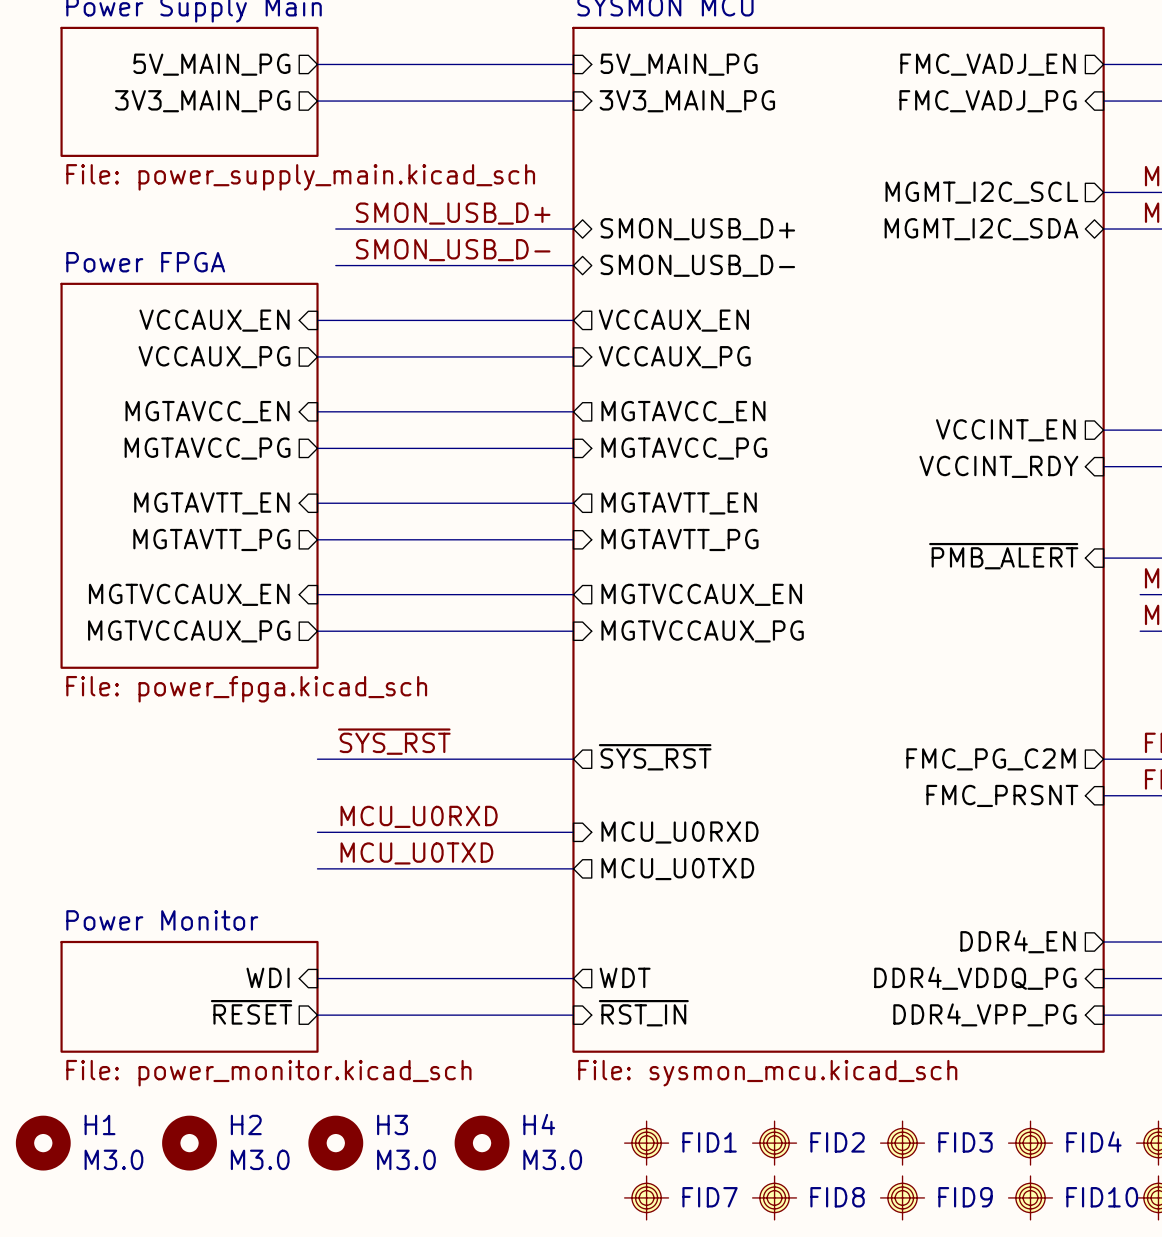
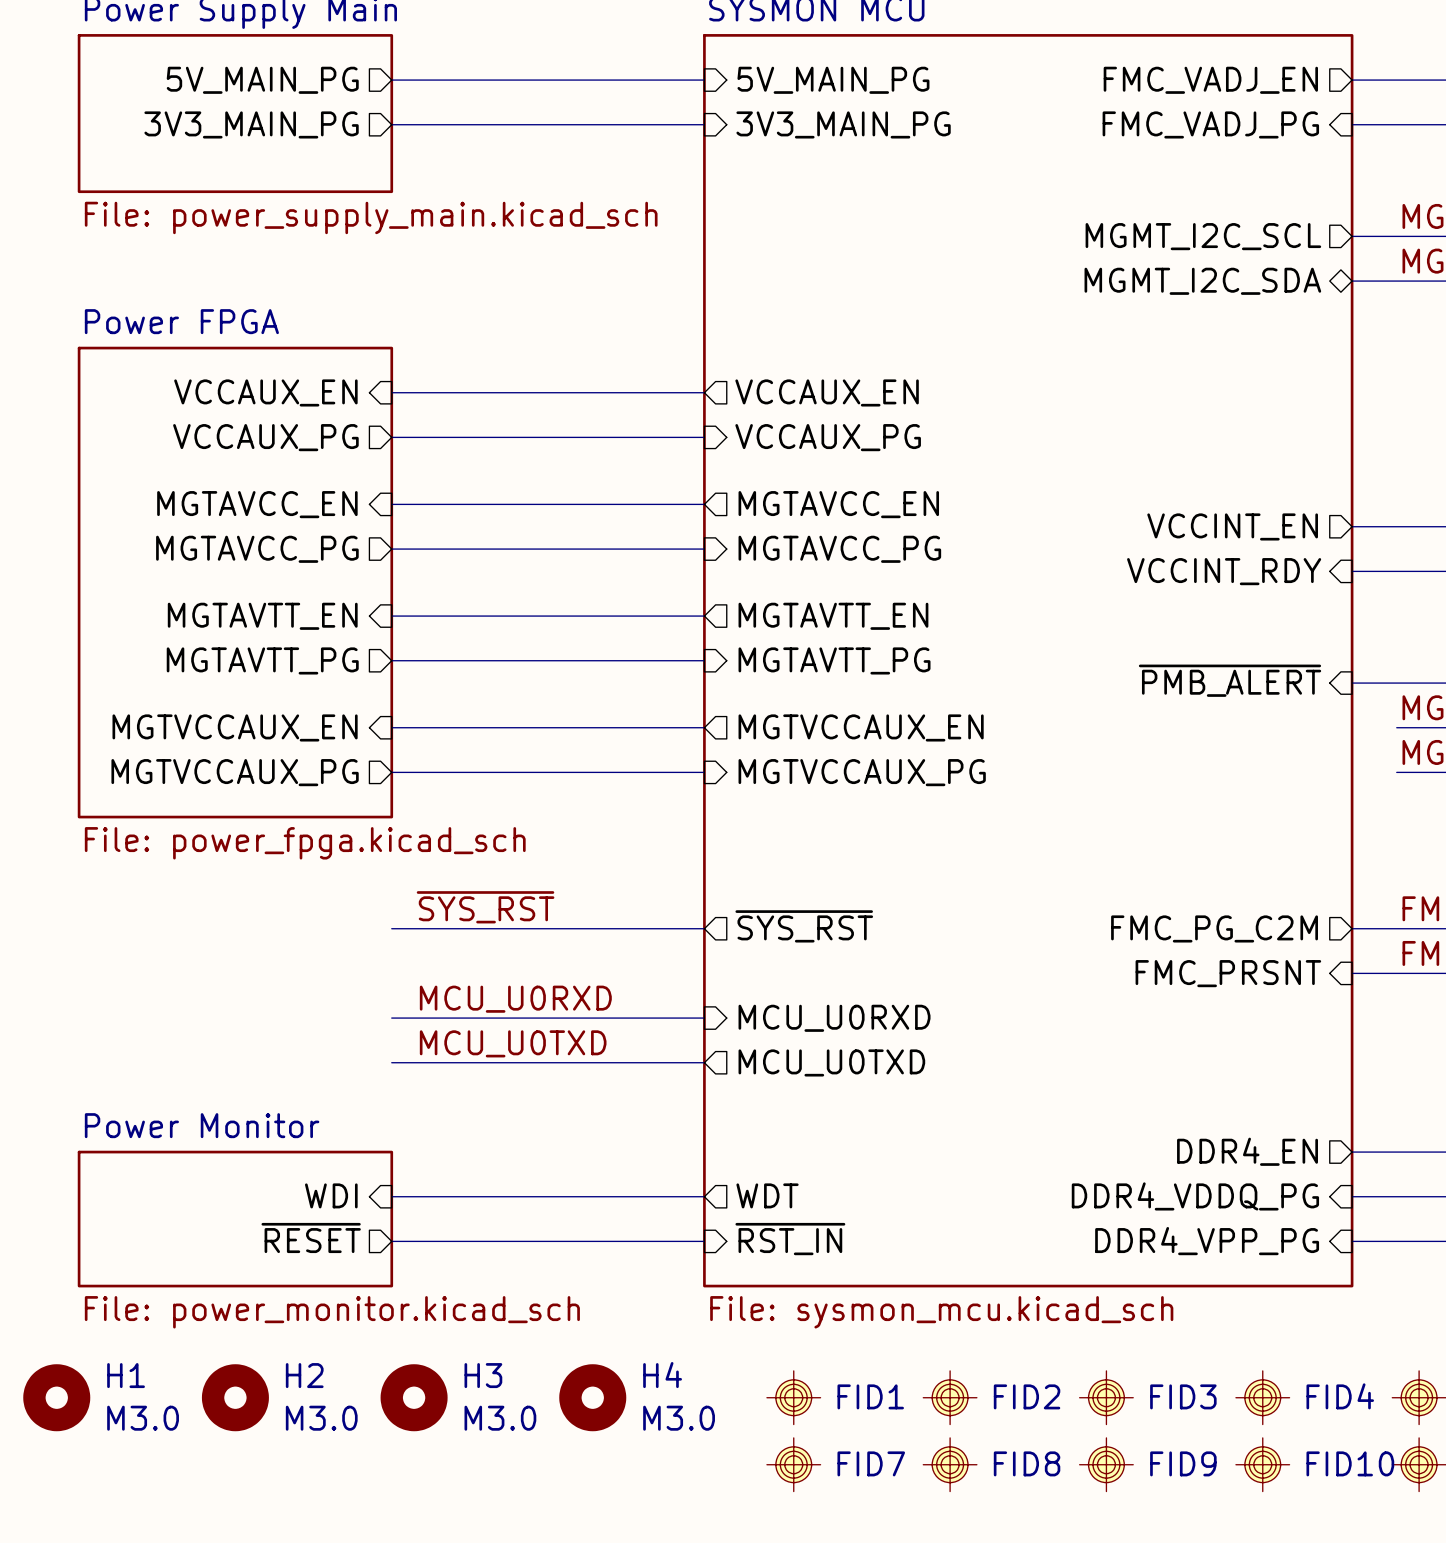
label: SMON_USB_D+ (453, 213) -> none
wire: (335, 229) (573, 229) -> none
sheet pin: SMON_USB_D+ (697, 229) -> none
label: SMON_USB_D- (453, 250) -> none
wire: (335, 265) (573, 265) -> none
sheet pin: SMON_USB_D- (697, 265) -> none

